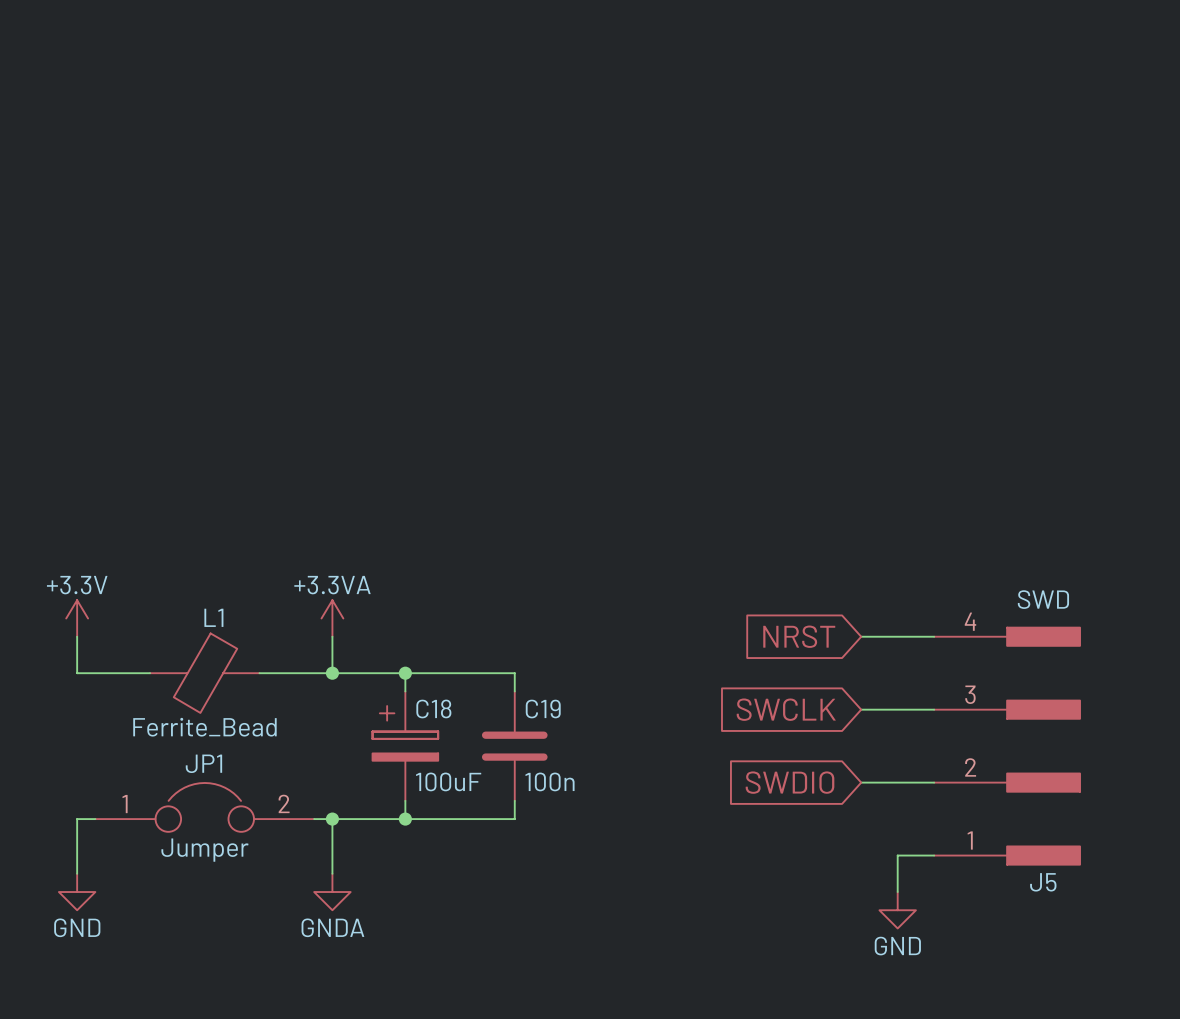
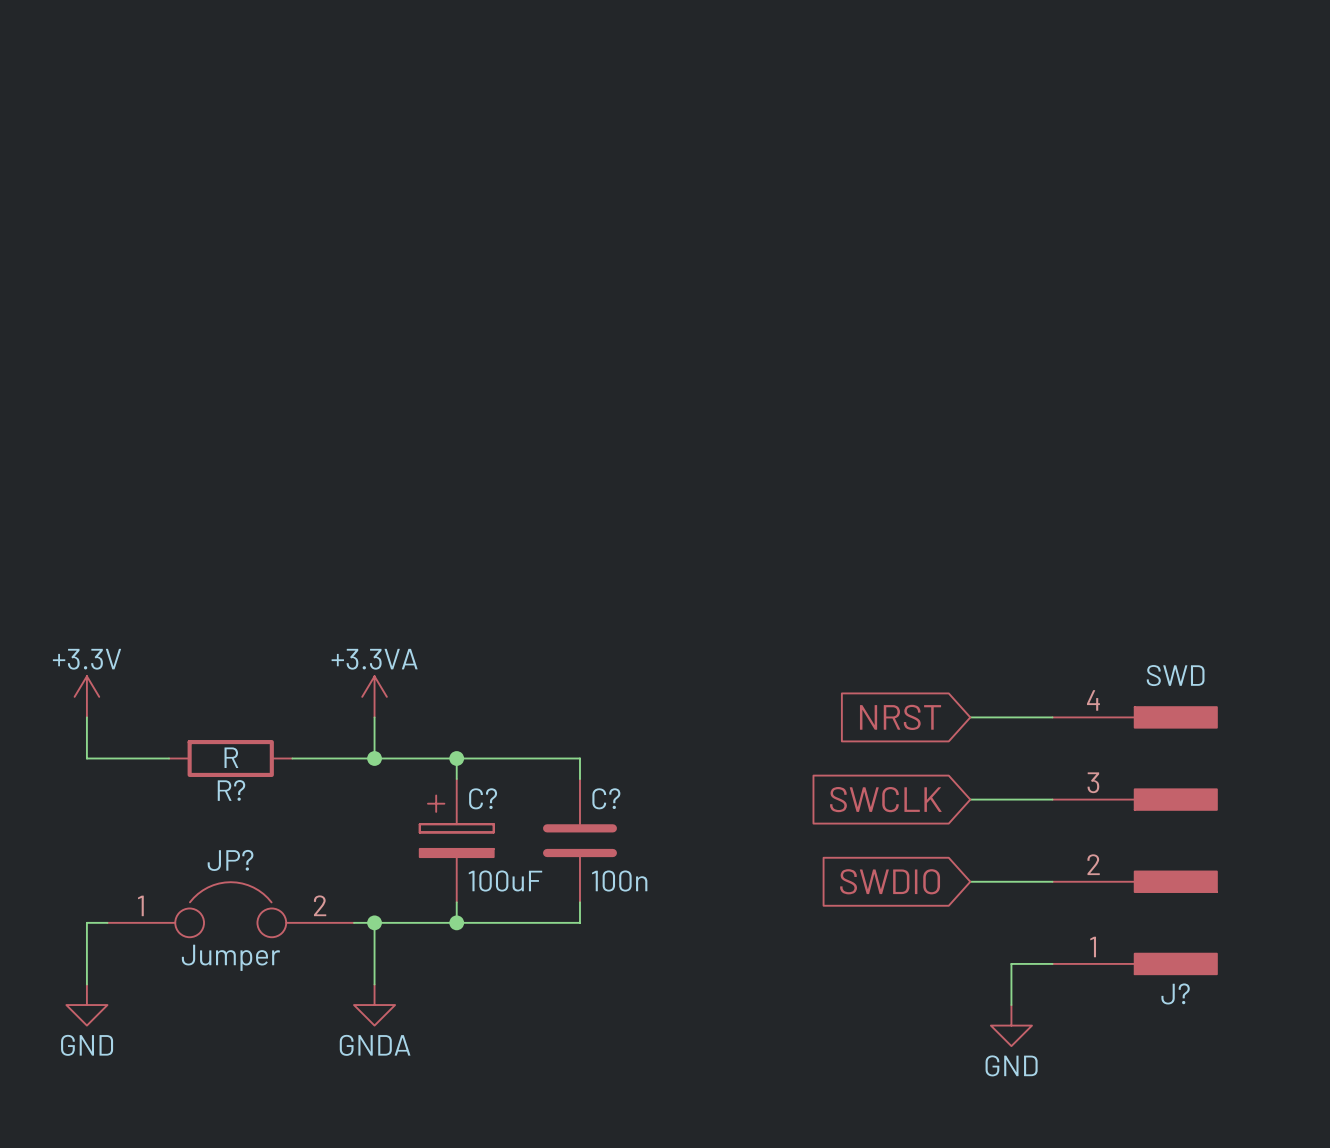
L1: Ferrite_Bead (204, 673) -> none
R?: none -> R (230, 758)
C18 name: C18 (433, 708) -> C? (483, 798)
C19 name: C19 (543, 709) -> C? (606, 798)
JP1 name: JP1 (203, 763) -> JP? (230, 860)
J5 name: J5 (1043, 882) -> J? (1175, 993)

